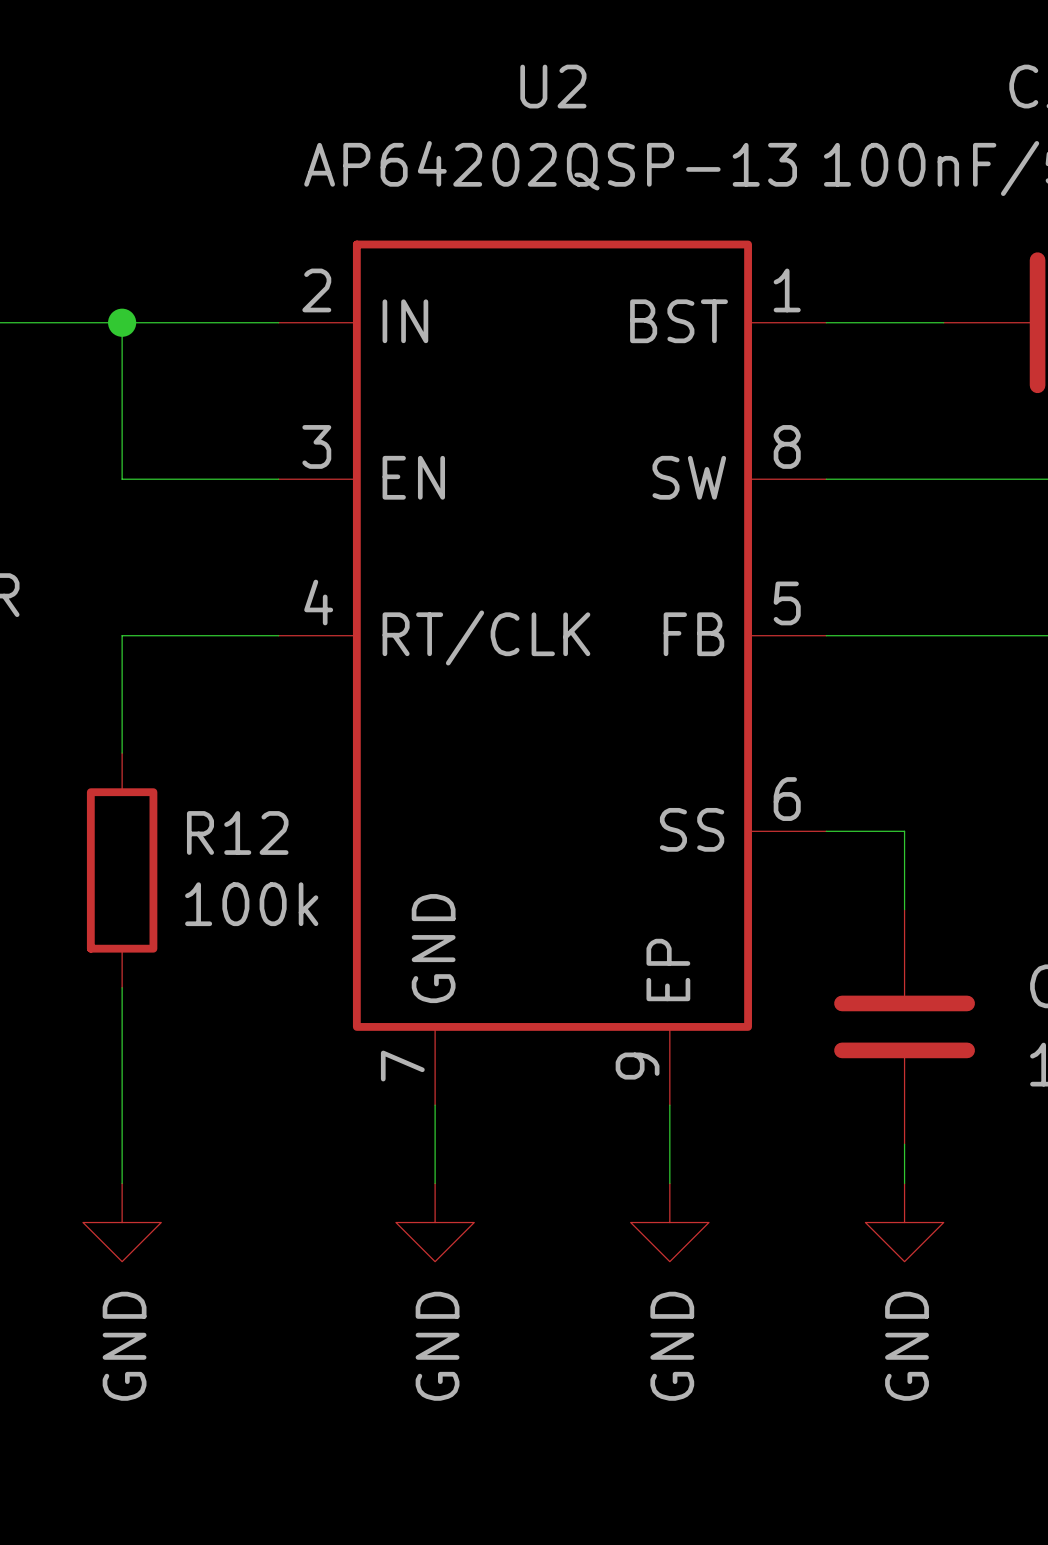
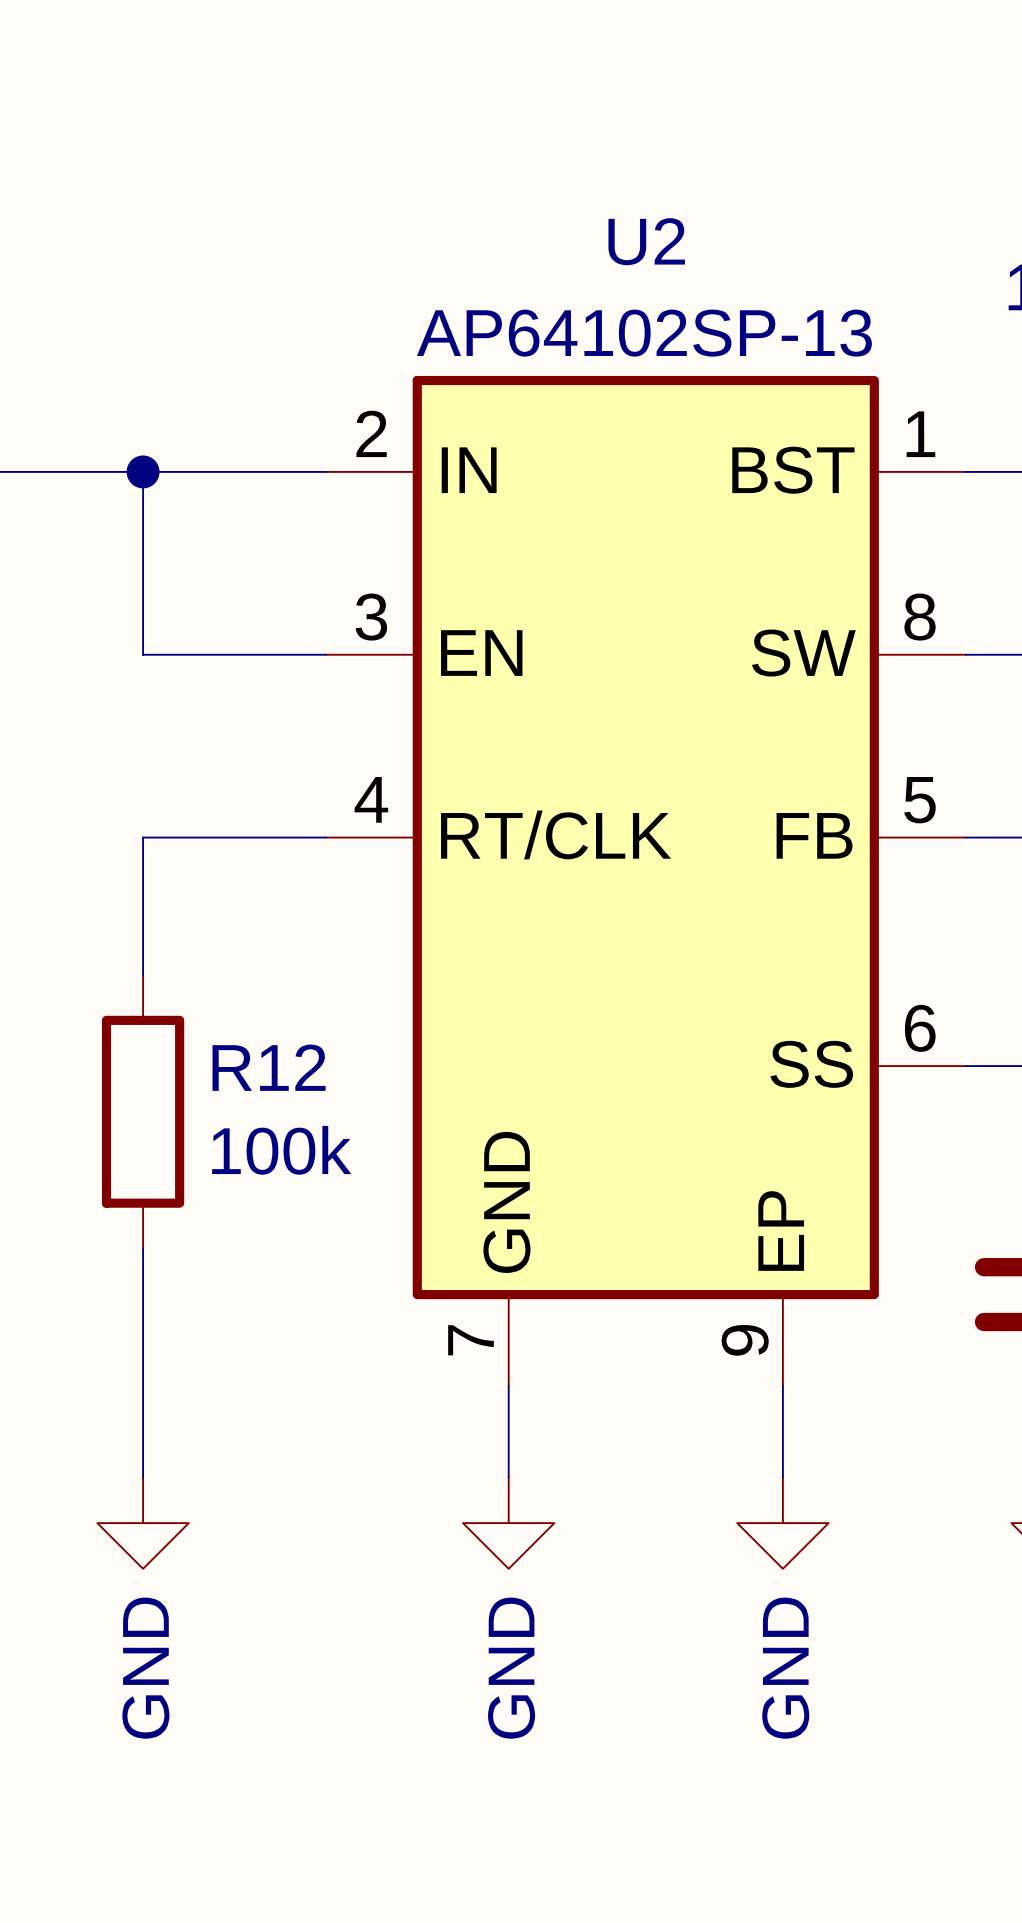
U2 name position: U2 (553, 86) -> U2 (646, 241)
U2 value: AP64202QSP-13 (550, 165) -> AP64102SP-13 (644, 333)

